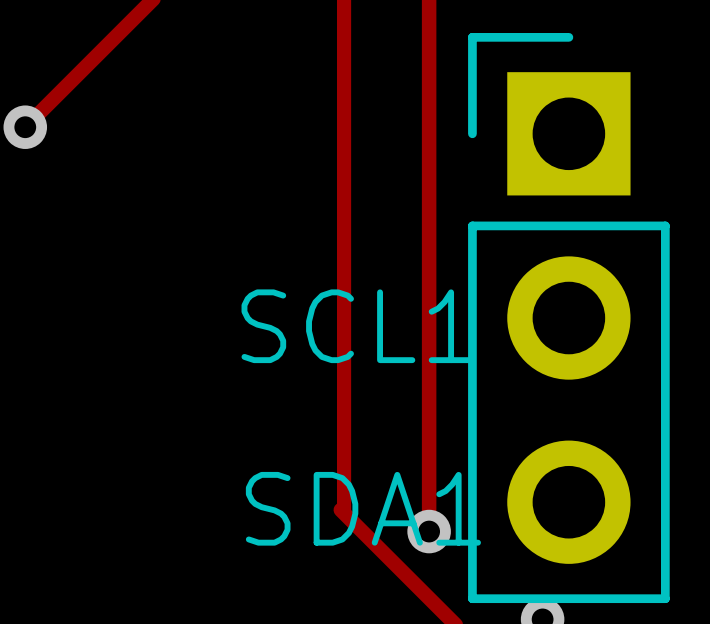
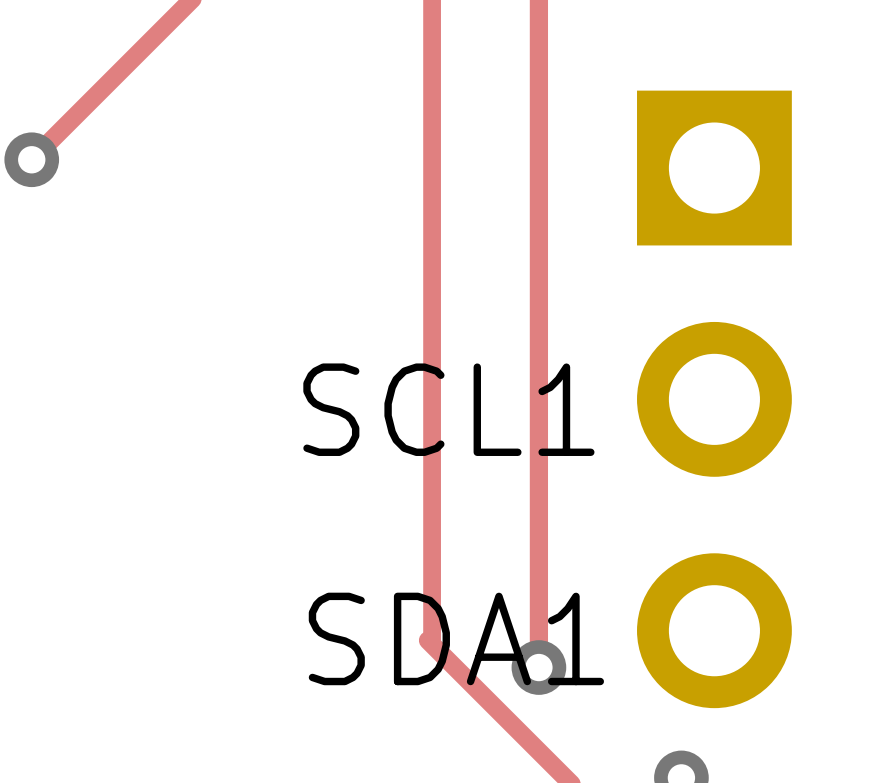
part footprint: [468, 32, 670, 604] -> [637, 90, 792, 709]

